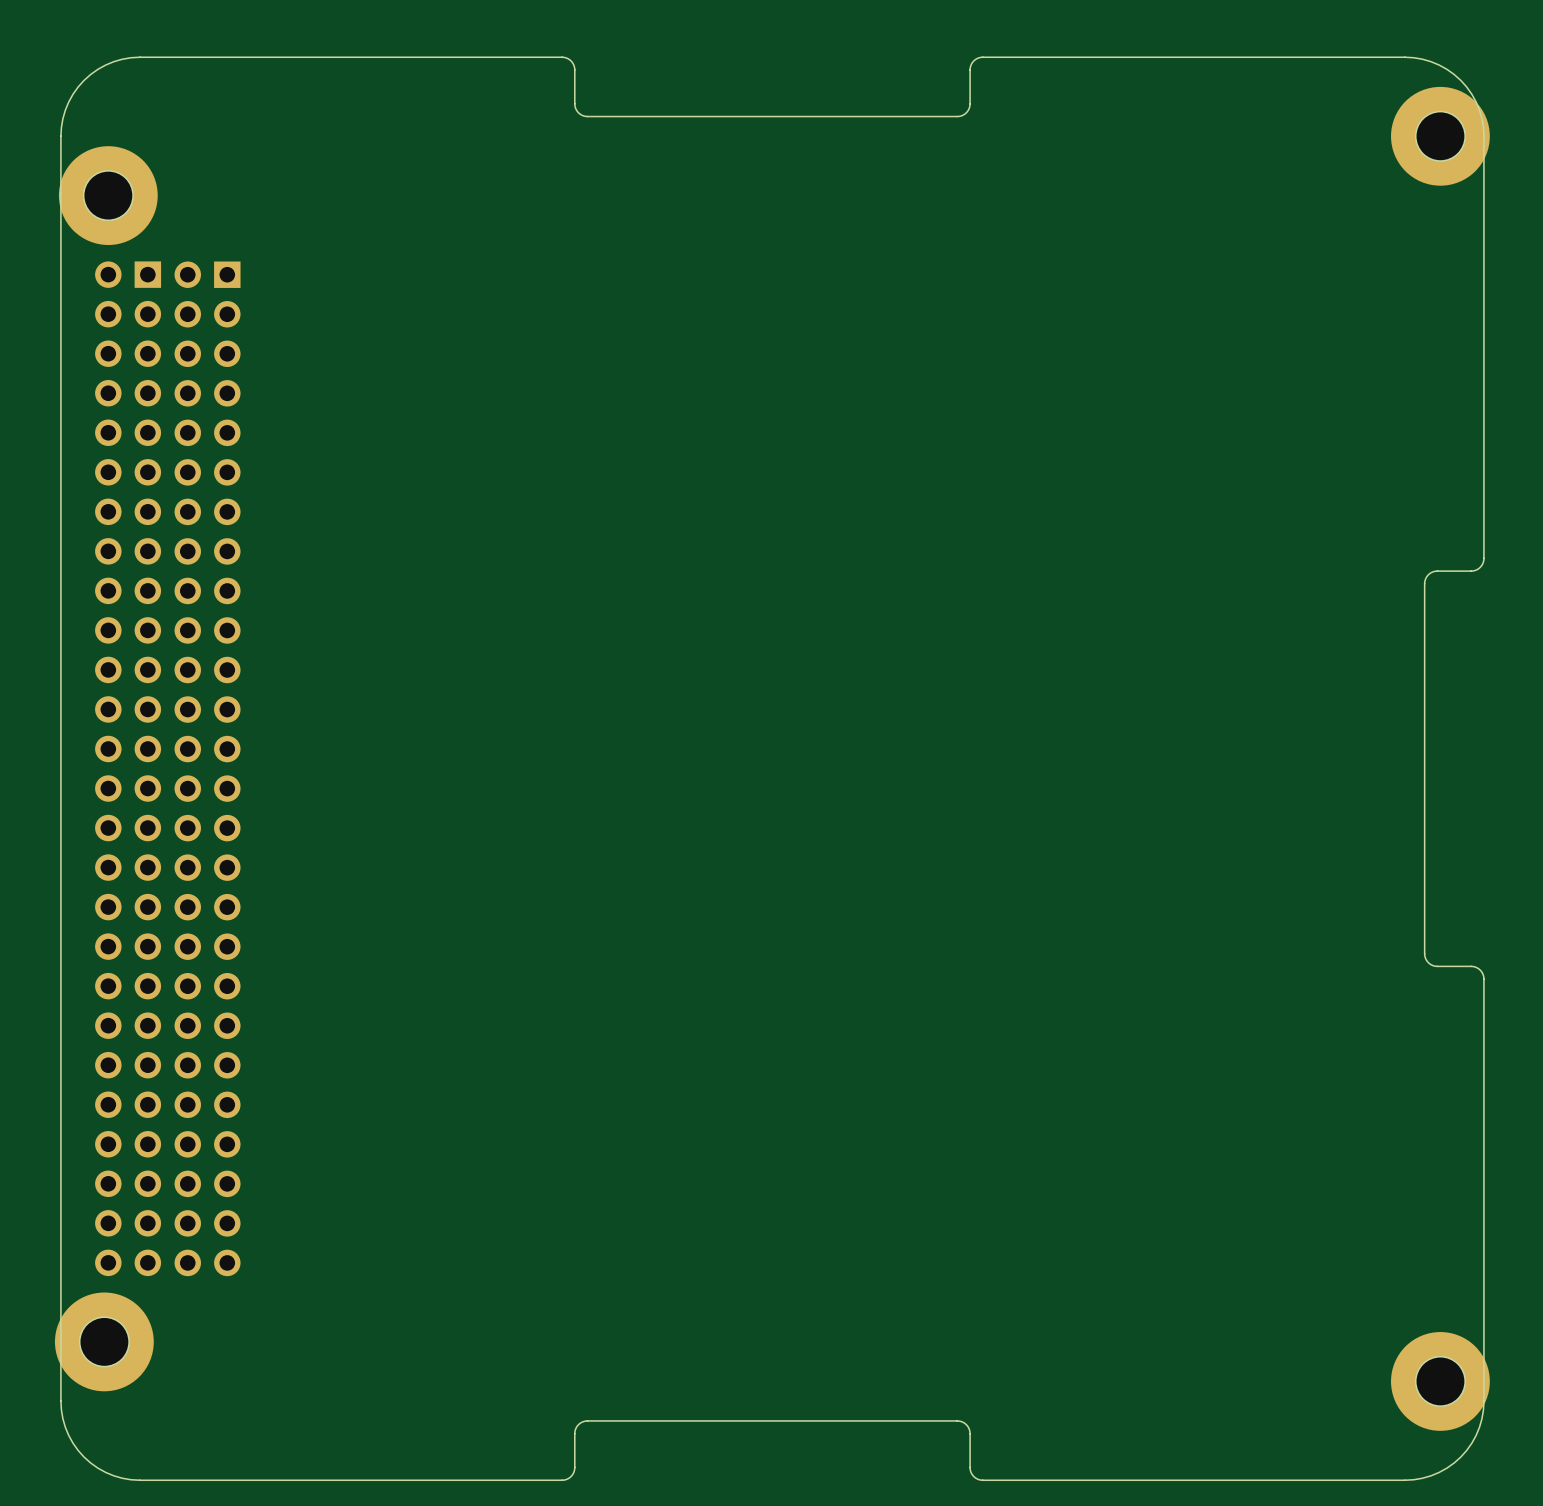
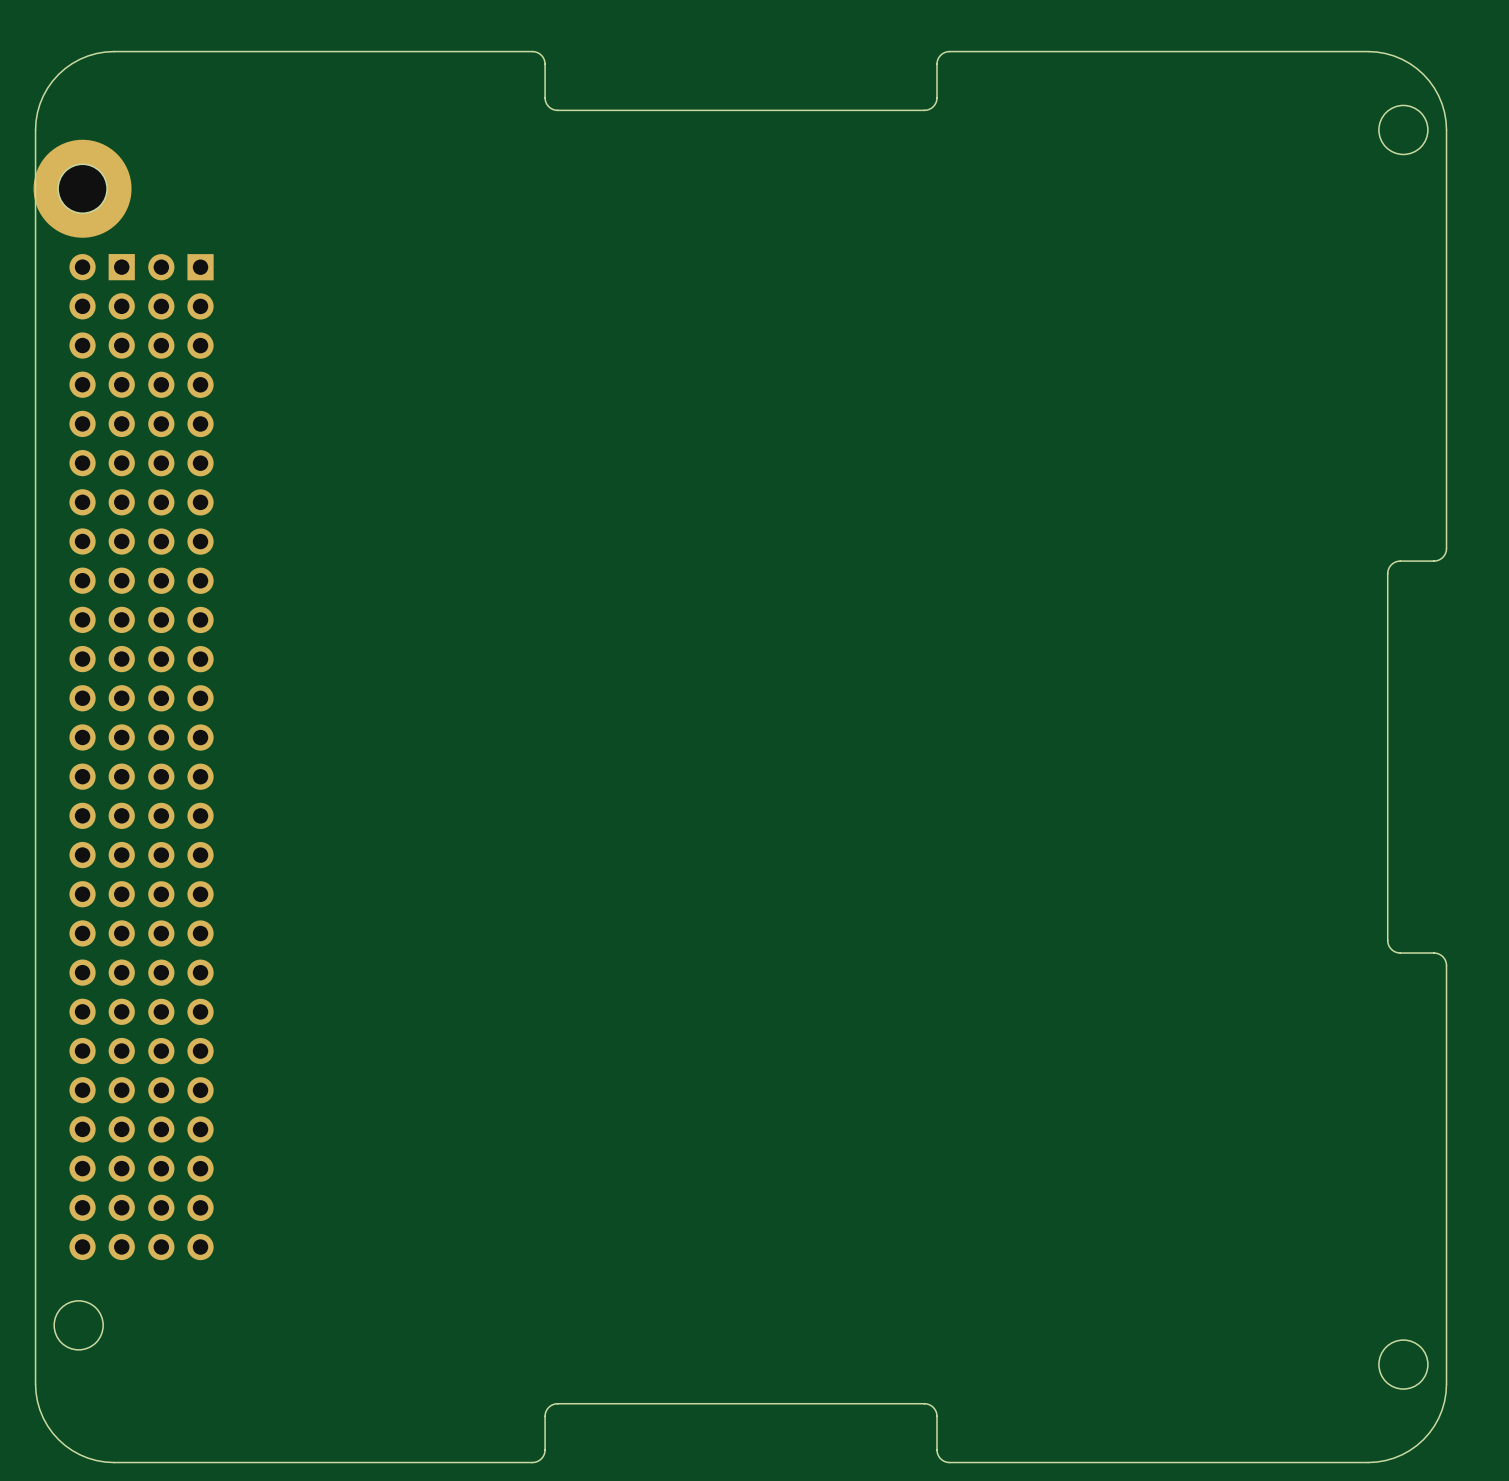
part: (1440, 136) -> none
part: (104, 1341) -> none
part: (1440, 1381) -> none

